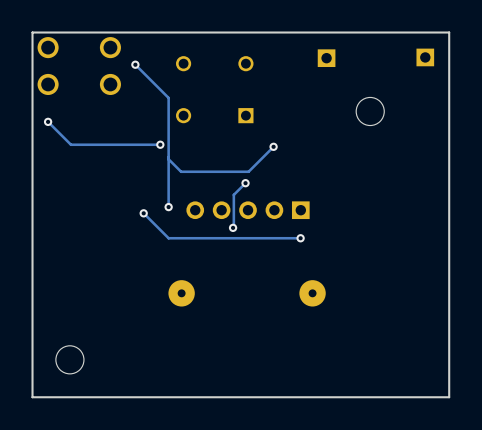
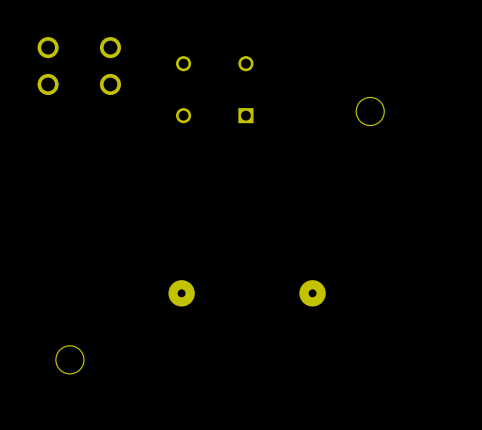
board edge: (449, 32) (32, 32) (32, 397) (449, 397) (449, 32) -> none
part: (425, 57) -> none
part: (326, 58) -> none
track: (135, 64) (168, 97) (168, 207) -> none
via: (135, 64) -> none
track: (48, 121) (70, 144) (160, 144) -> none
via: (48, 121) -> none
via: (160, 144) -> none
track: (273, 146) (248, 171) (181, 171) (168, 159) -> none
via: (273, 146) -> none
track: (245, 183) (233, 194) (233, 227) -> none
via: (245, 183) -> none
via: (168, 207) -> none
part: (248, 210) -> none
track: (143, 213) (168, 238) (300, 238) -> none
via: (143, 213) -> none
via: (233, 227) -> none
via: (300, 238) -> none

